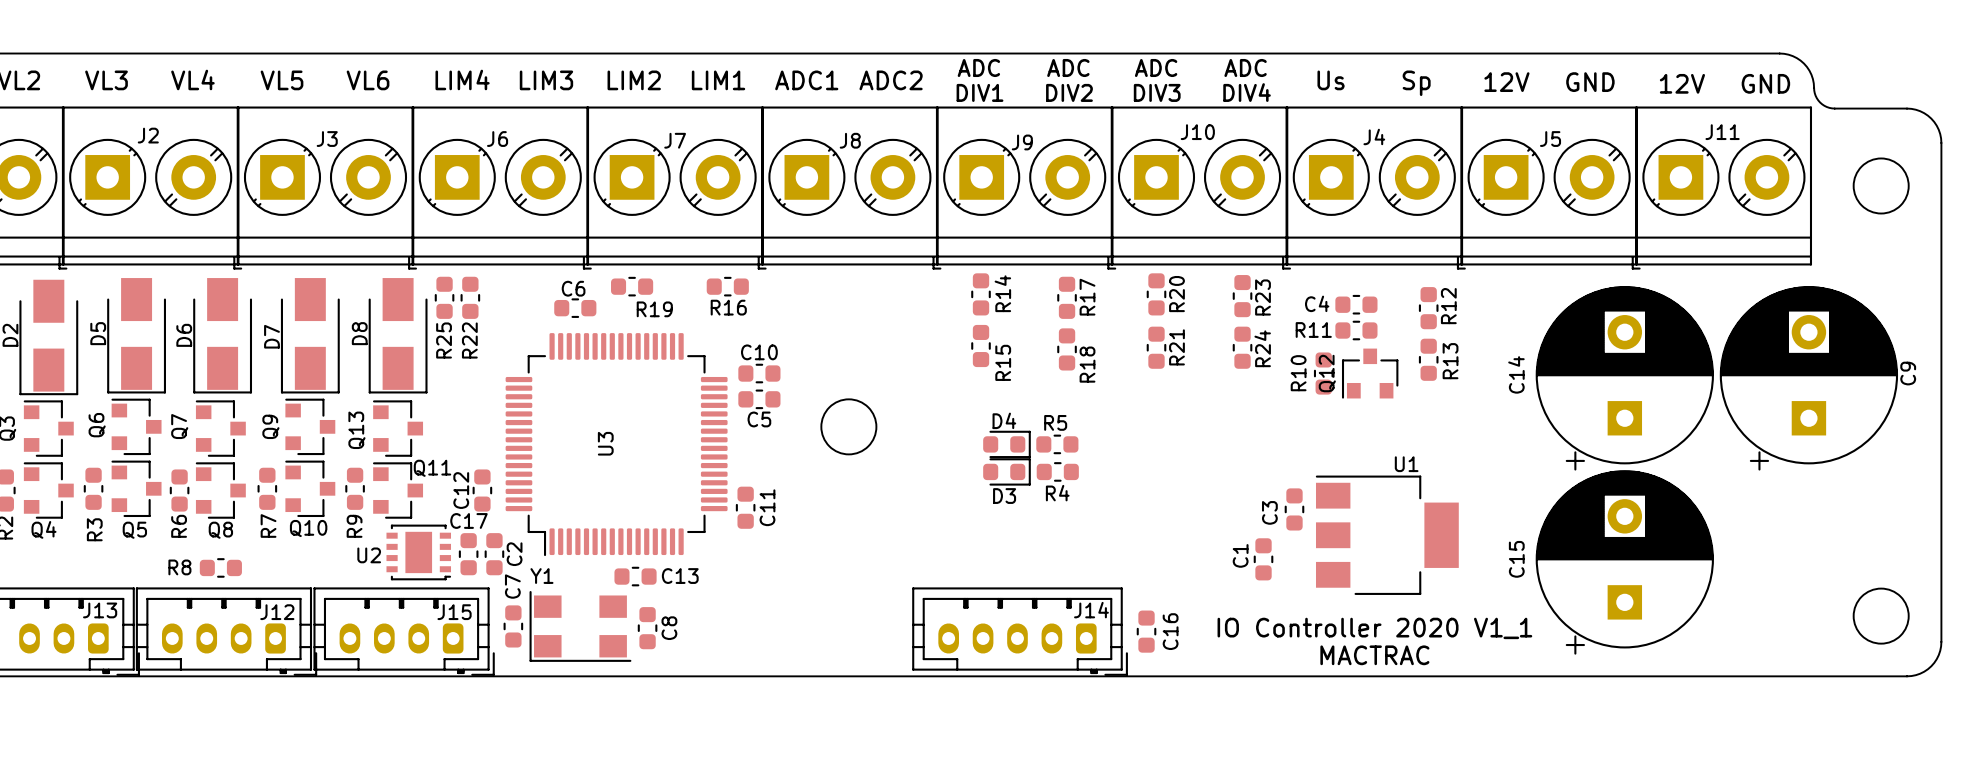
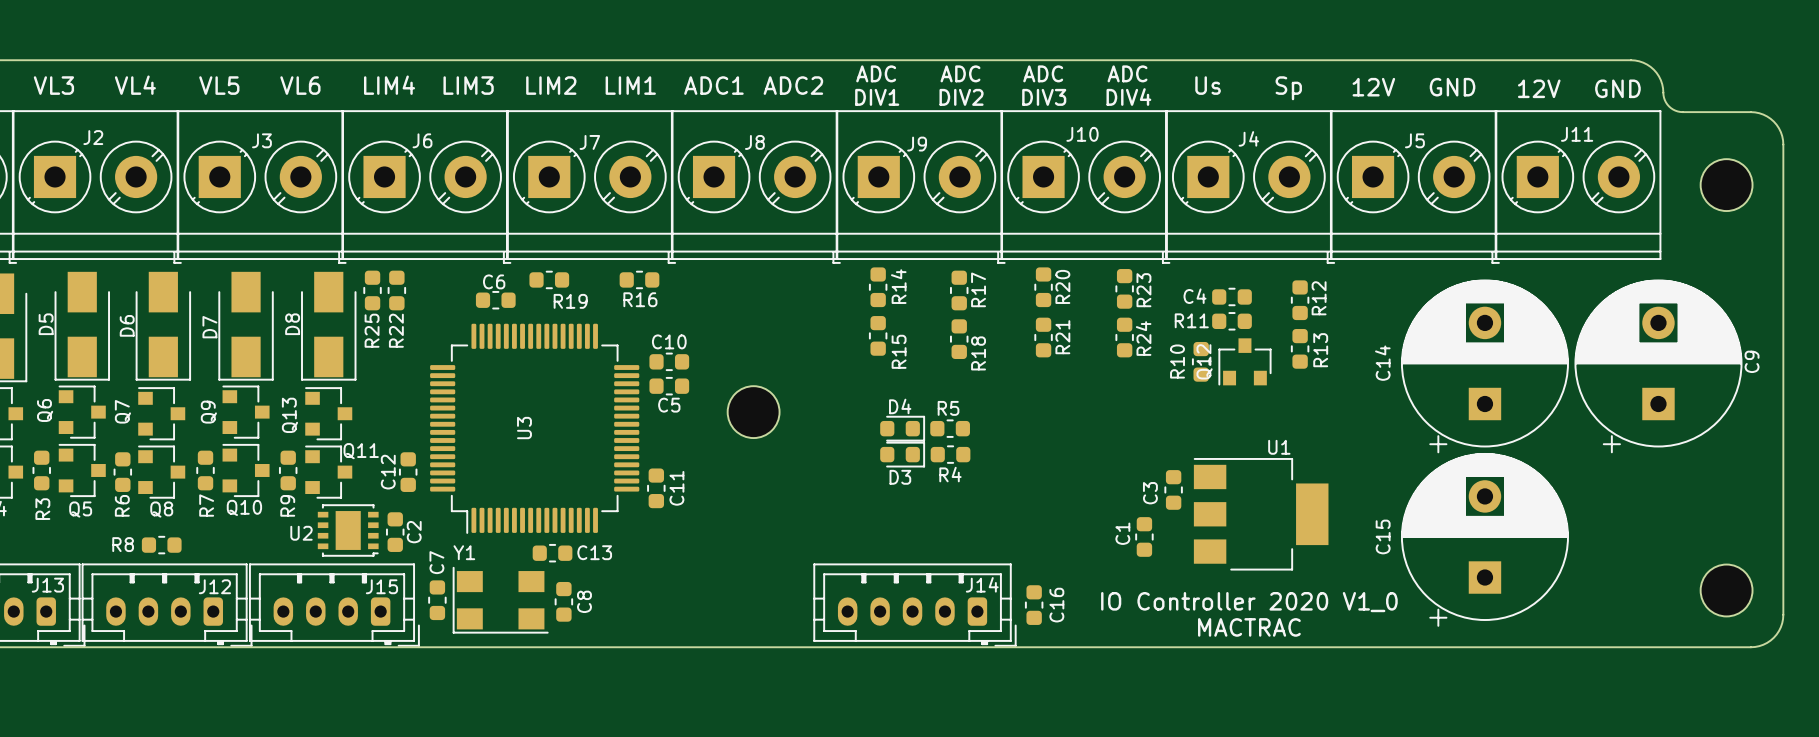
C17 name: C17 (468, 520) -> C2 (414, 532)
C2: (494, 554) -> none
text: IO Controller 2020 V1_1 (1374, 628) -> IO Controller 2020 V1_0 (1249, 602)

